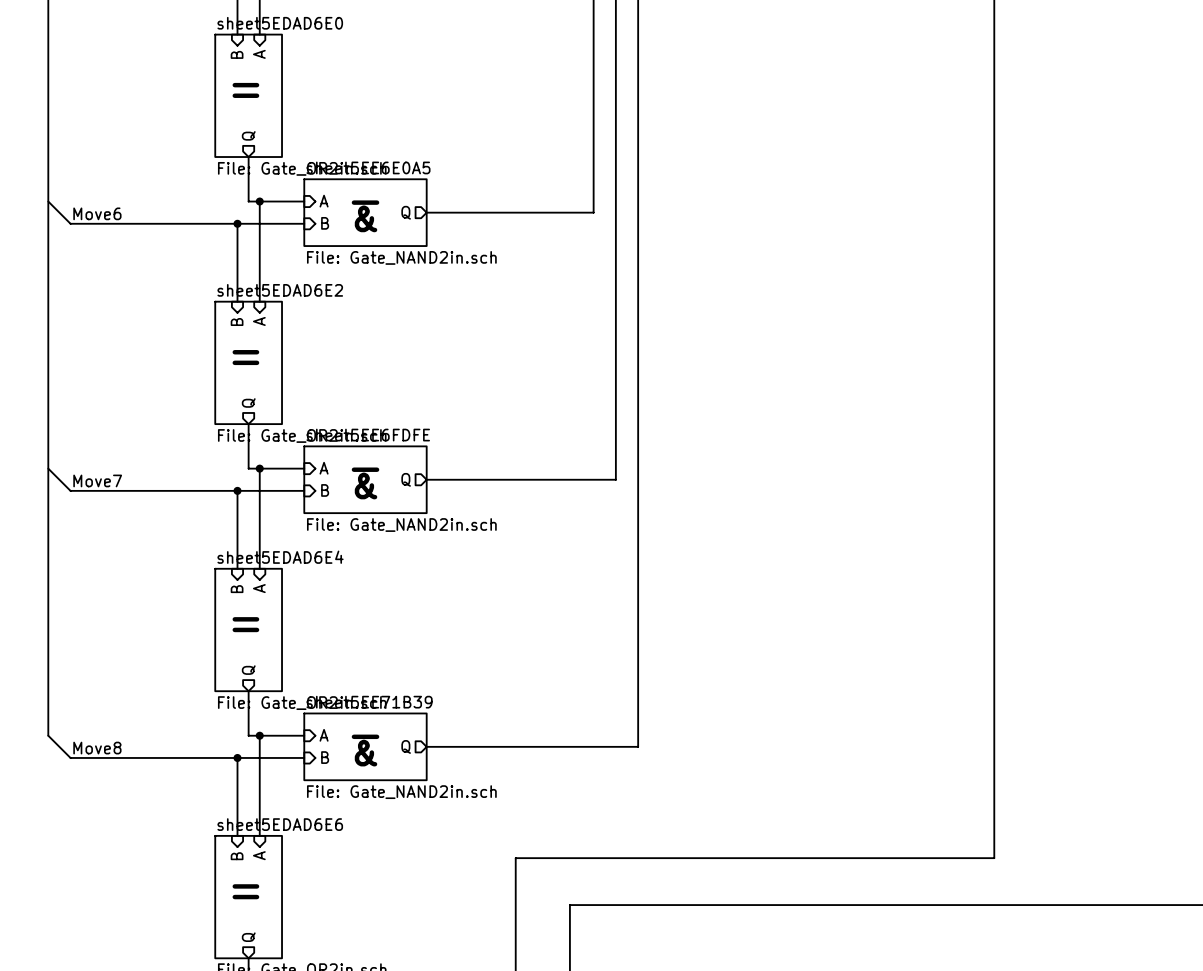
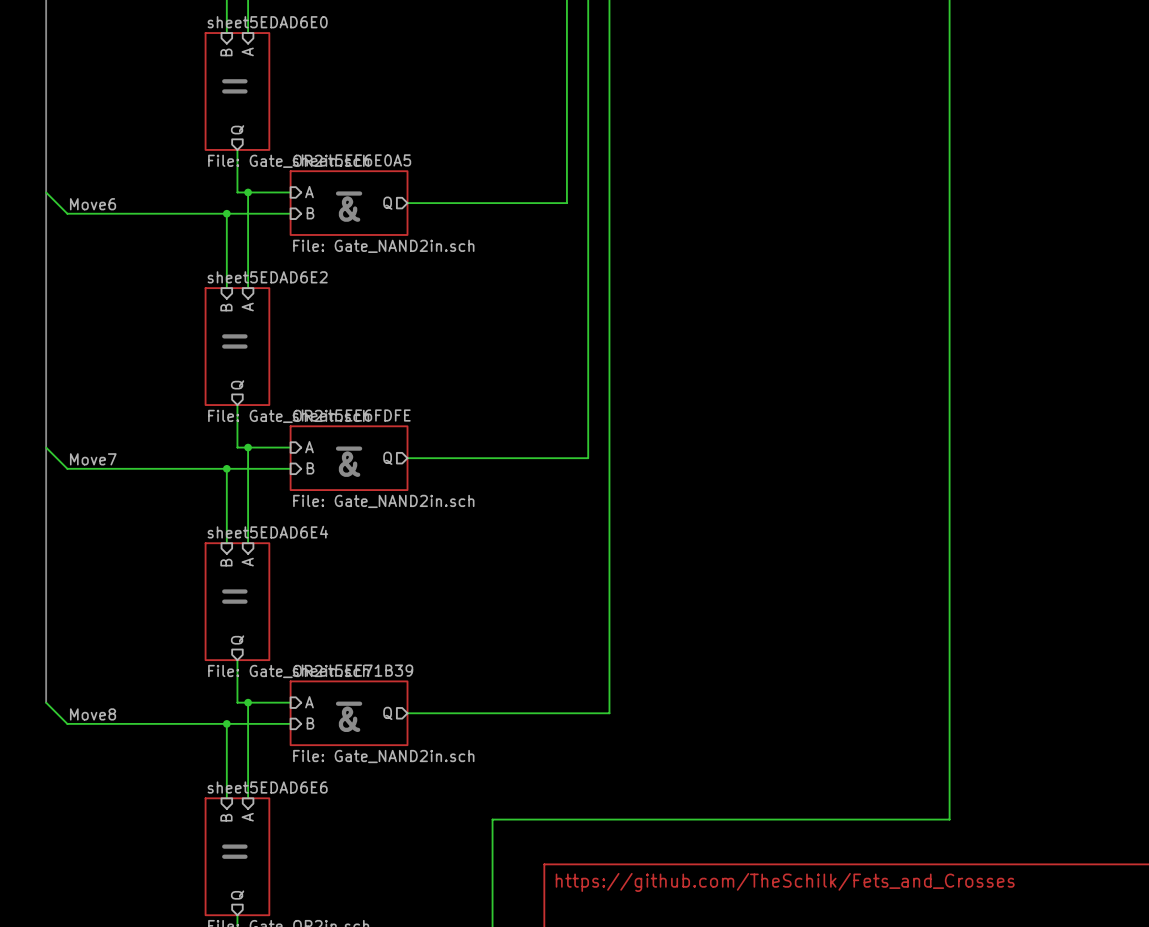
title block: none -> https://github.com/TheSchilk/Fets_and_Crosses (785, 882)

